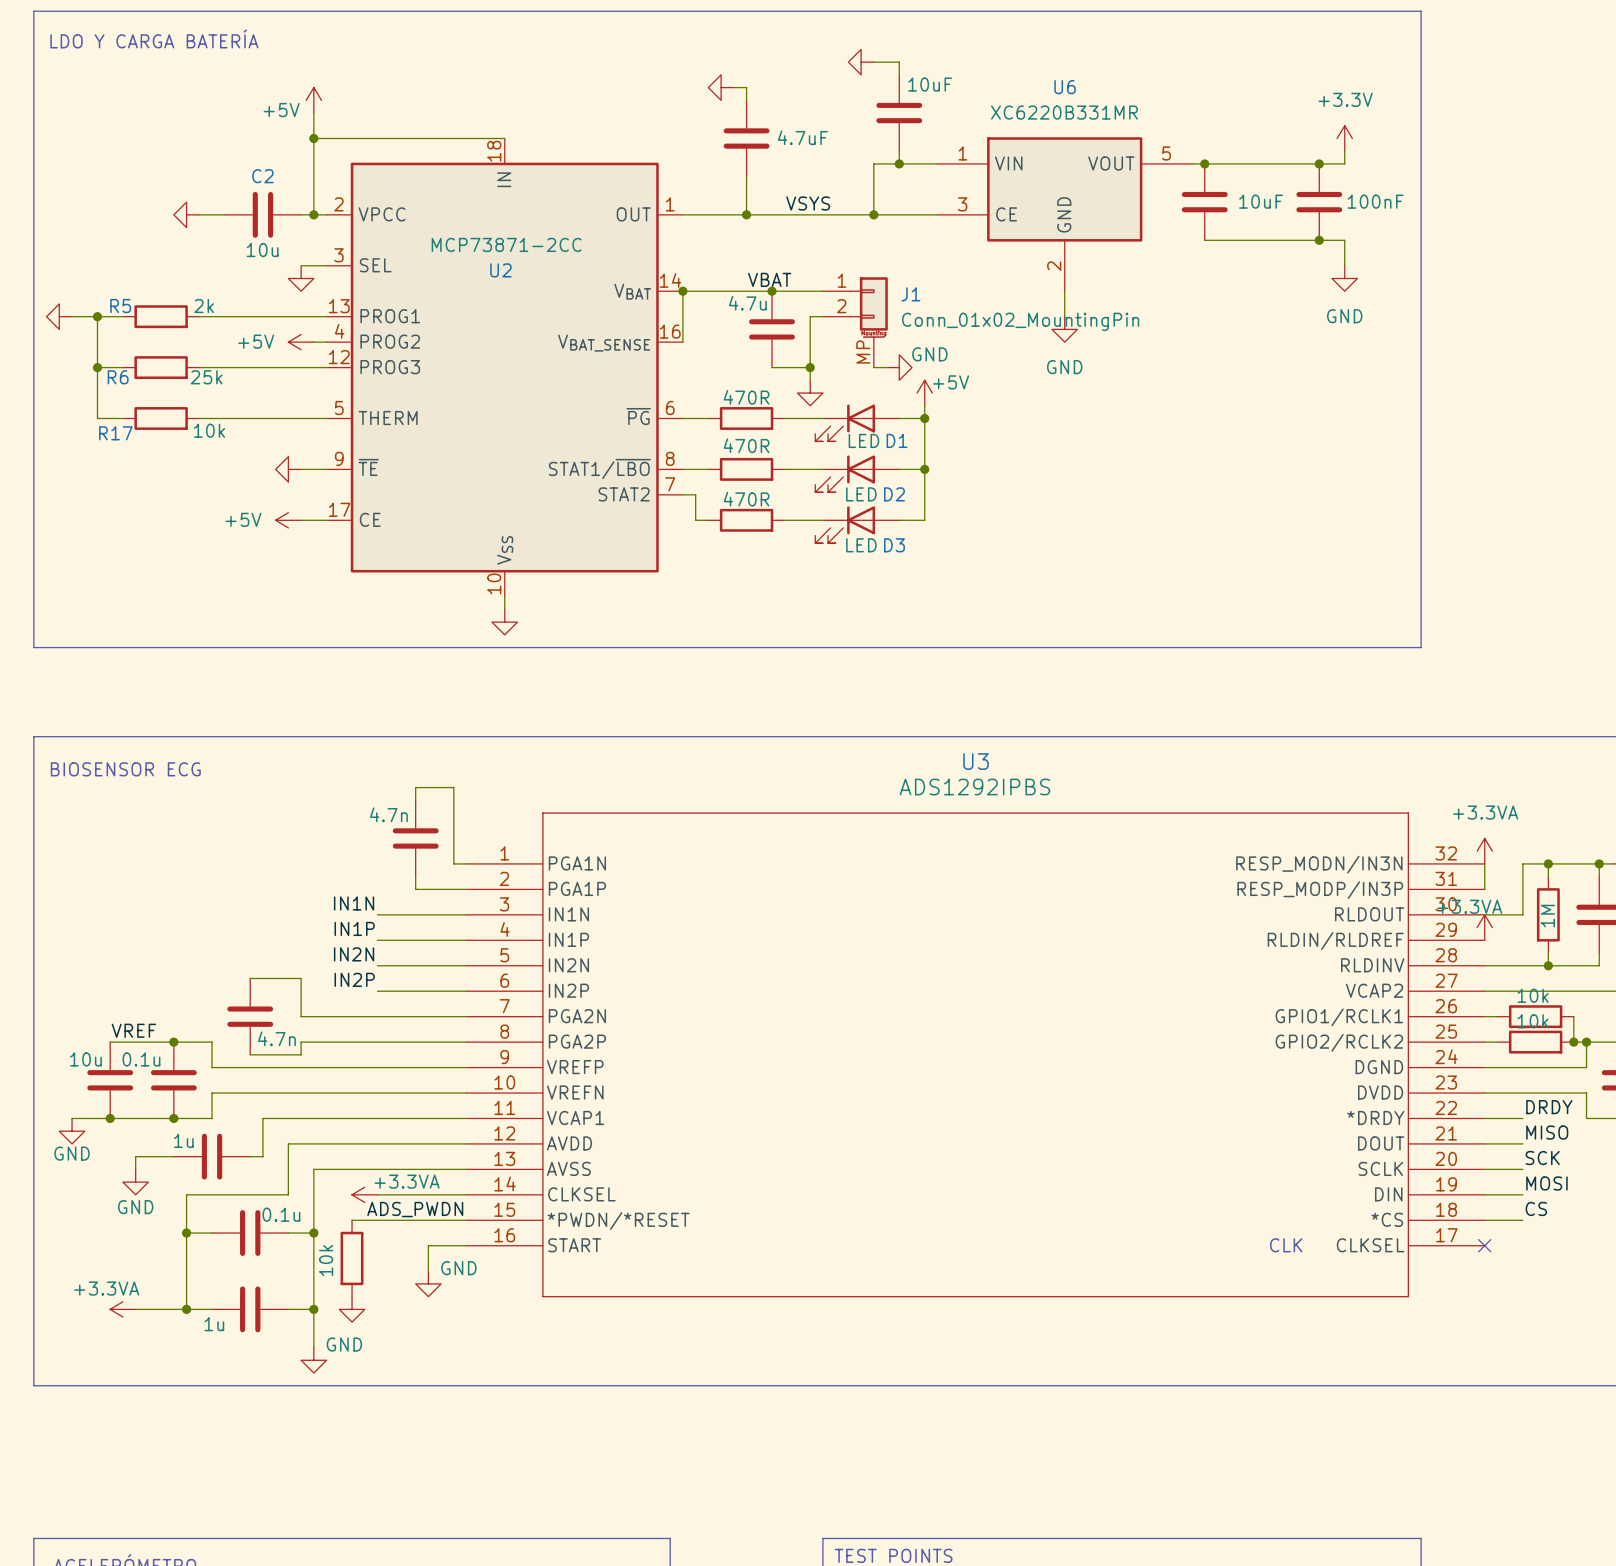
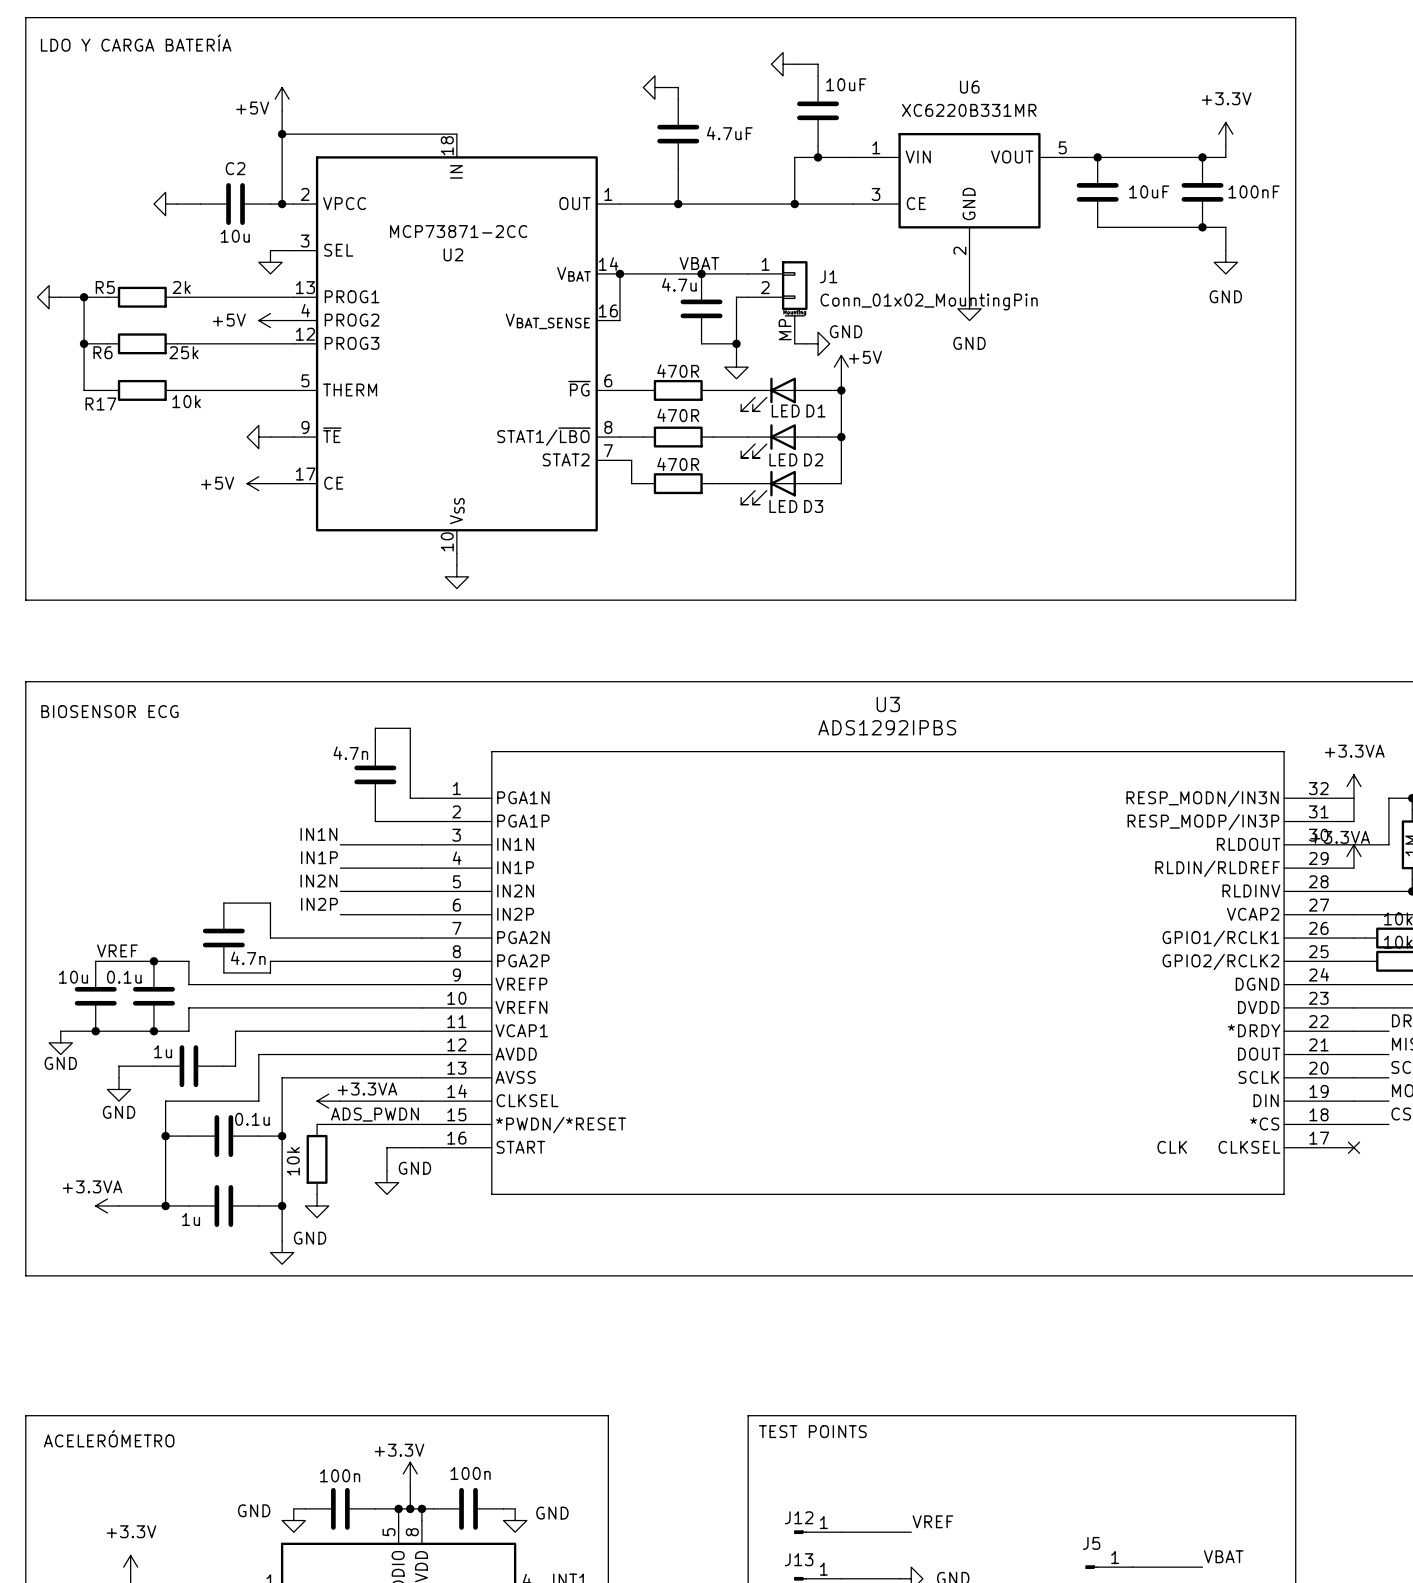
label: VSYS (808, 203) -> none

